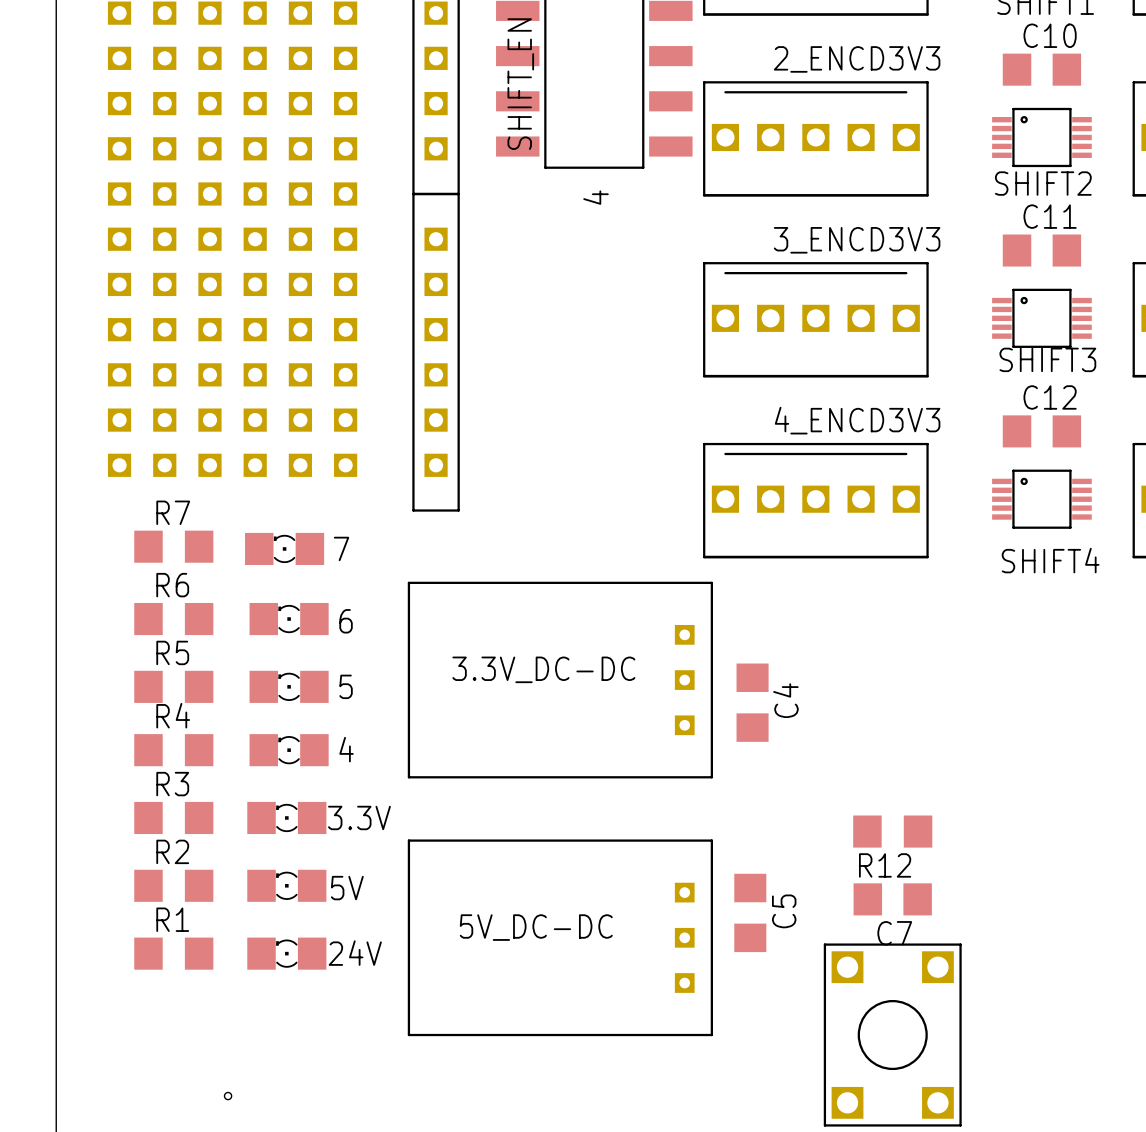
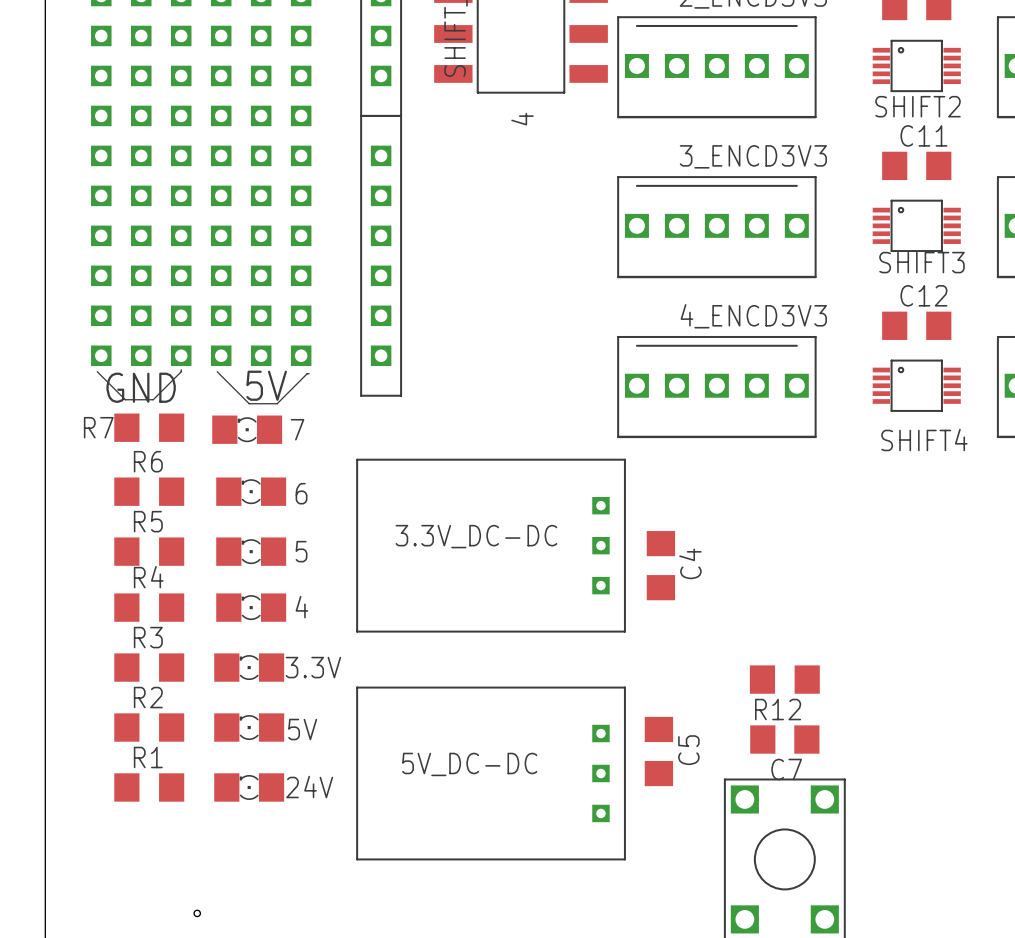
line: none -> (181, 369) (153, 399) (125, 399) (97, 371)
line: none -> (217, 371) (249, 403) (277, 403) (309, 373)
text: none -> 5V (266, 385)
text: none -> GND (141, 387)
R7 name position: R7 (173, 512) -> R7 (98, 427)

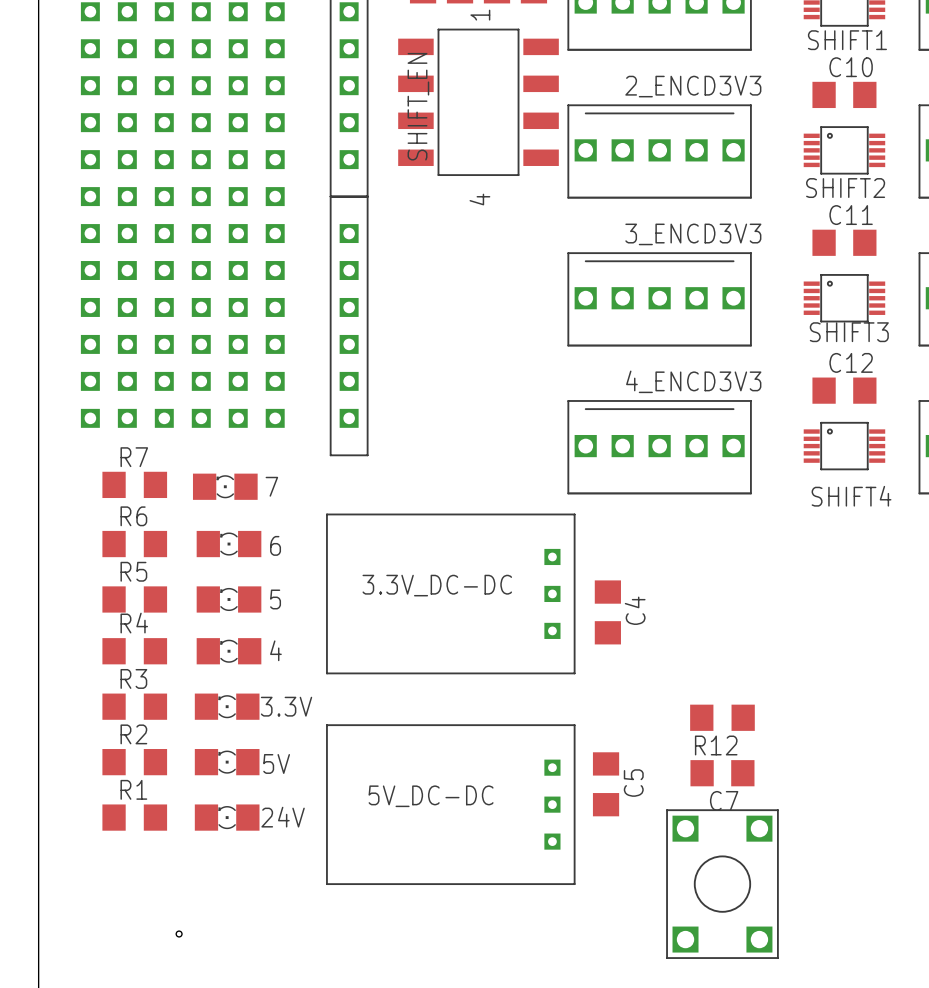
line: (181, 369) (153, 399) (125, 399) (97, 371) -> none
line: (217, 371) (249, 403) (277, 403) (309, 373) -> none
text: 5V (266, 385) -> none
text: GND (141, 387) -> none
R7 name position: R7 (98, 427) -> R7 (134, 457)

